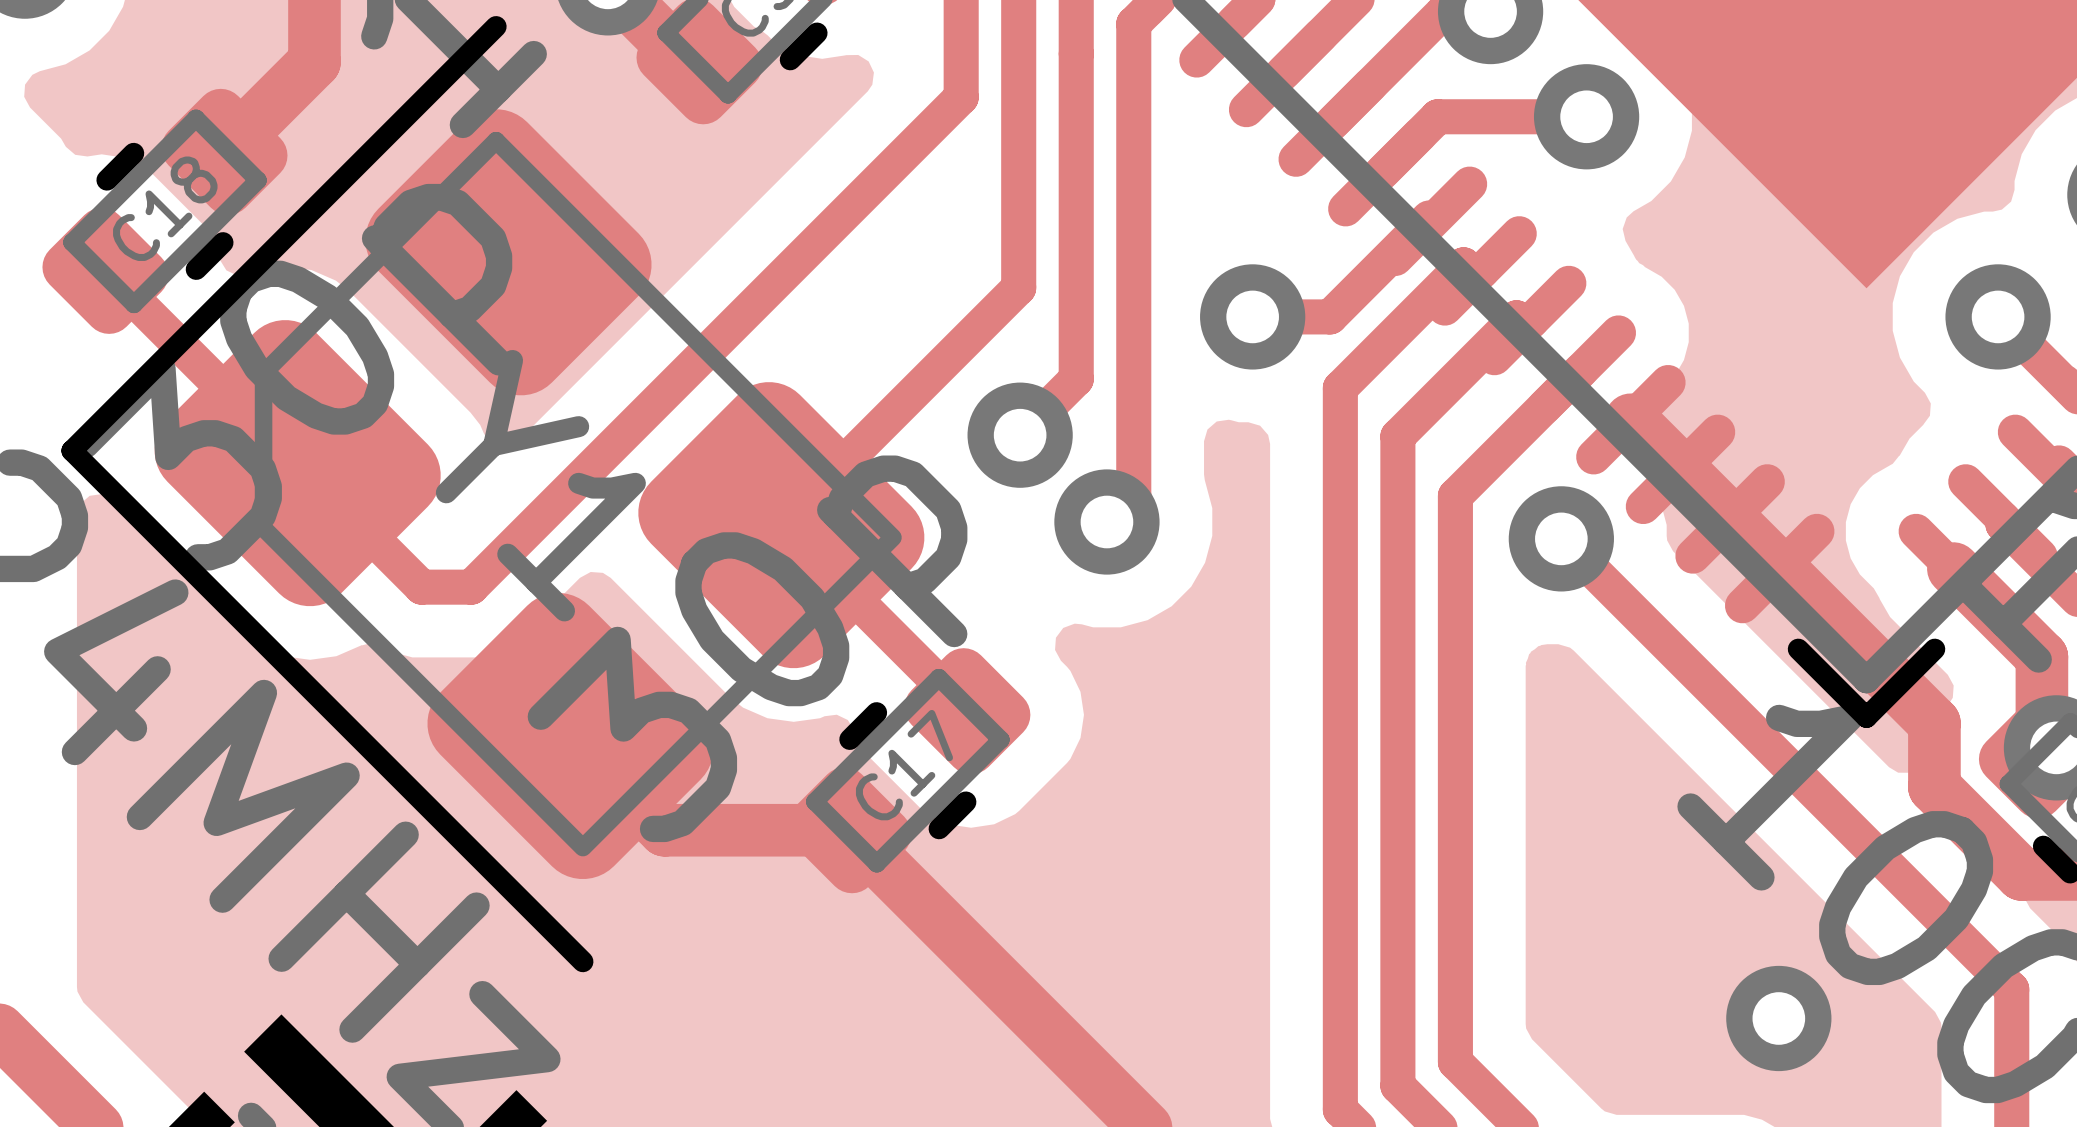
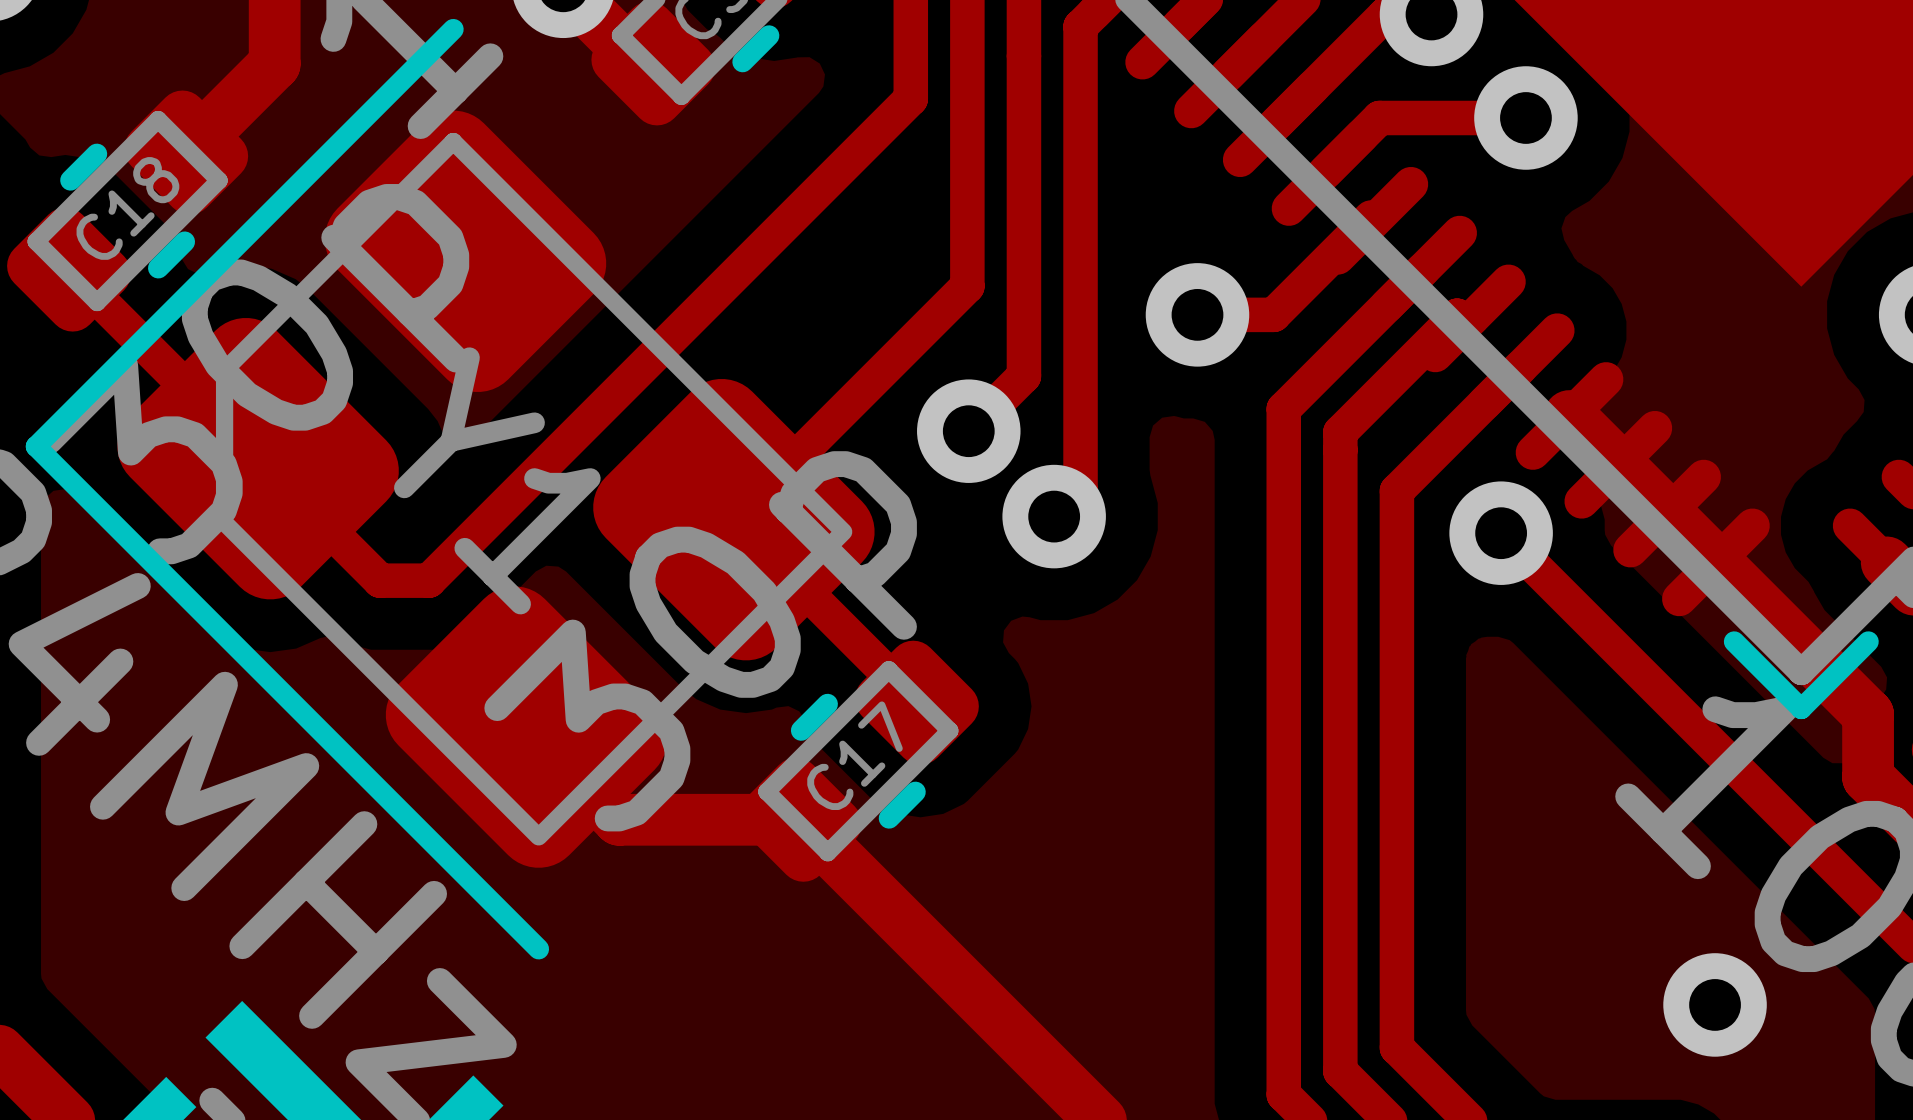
top track: (1482, 270) (1469, 270) (1463, 264) (1340, 388) (1340, 412) -> (1423, 269) (1283, 408)

